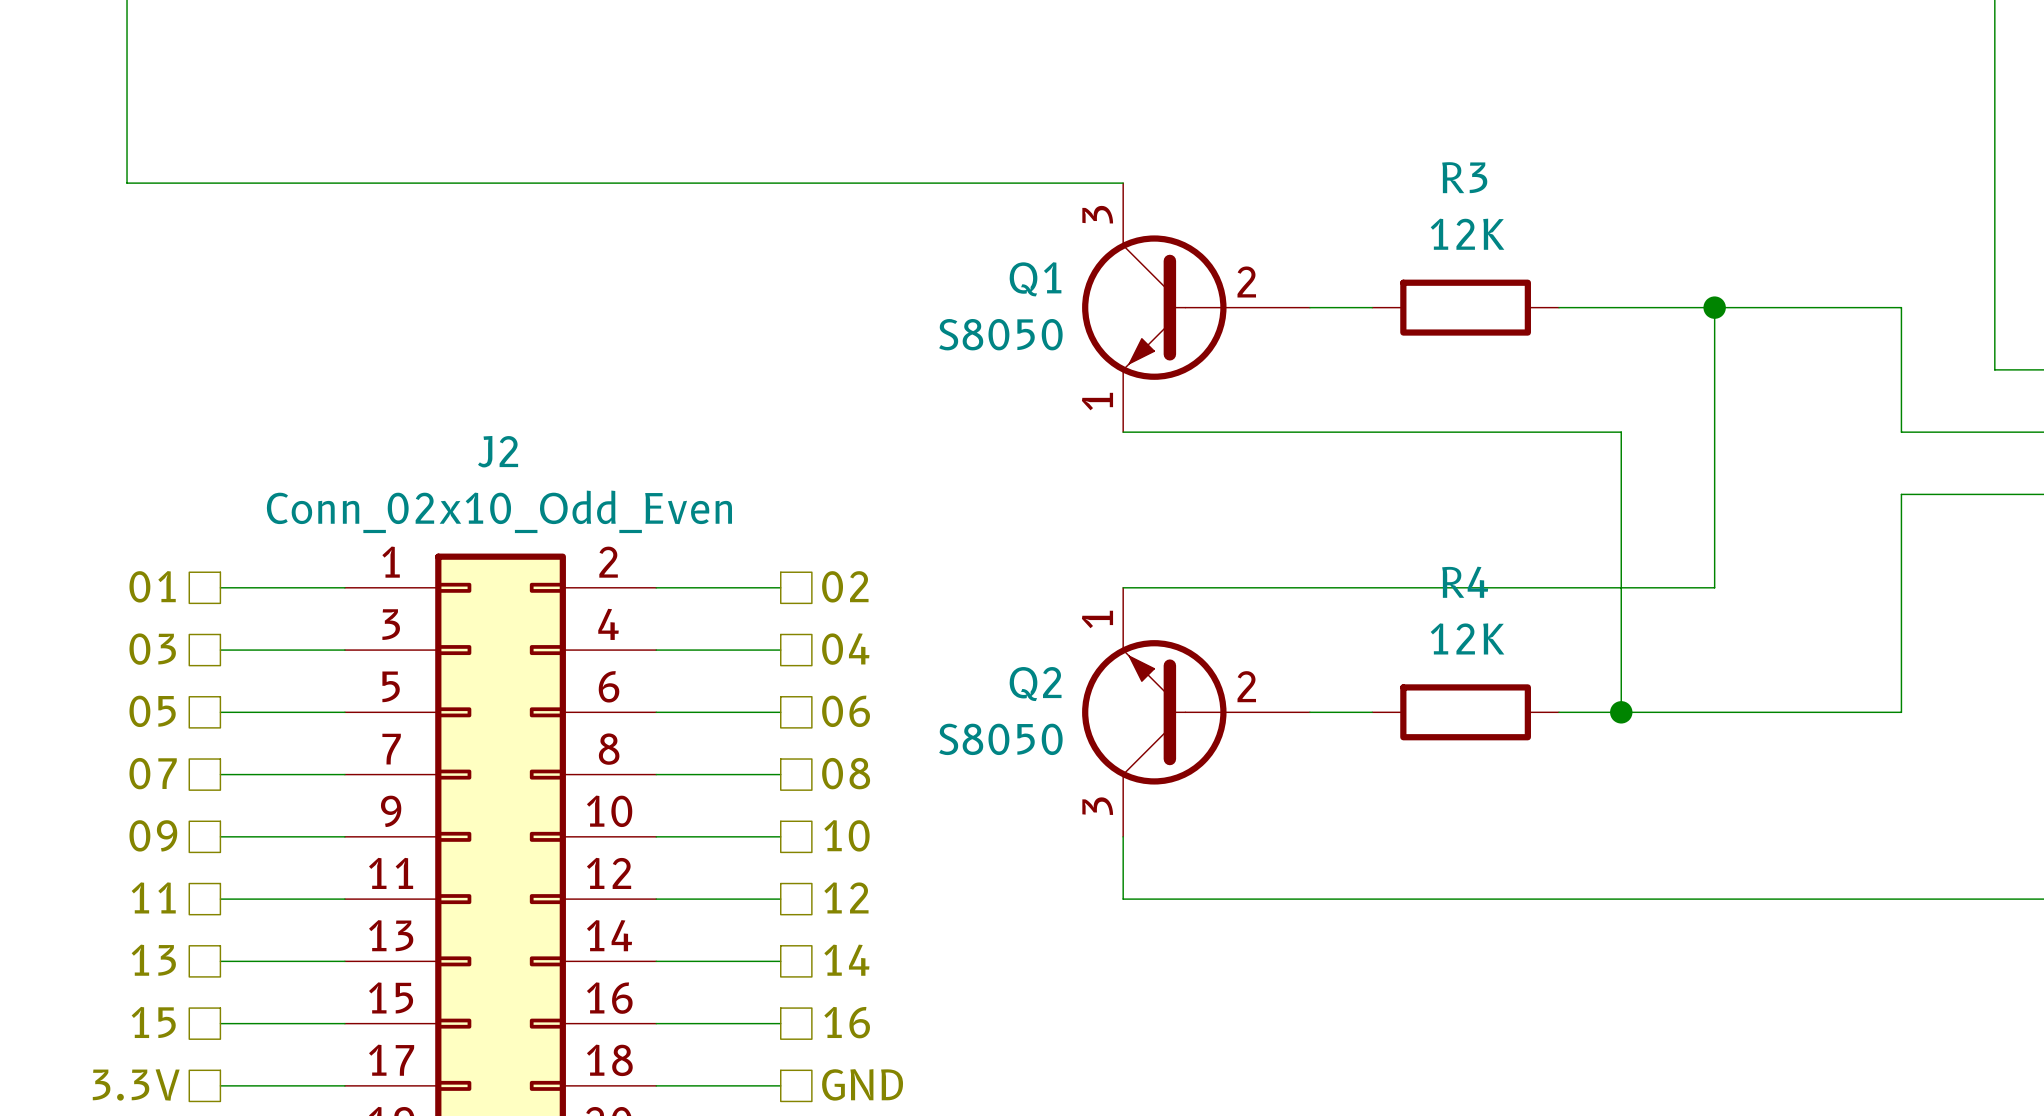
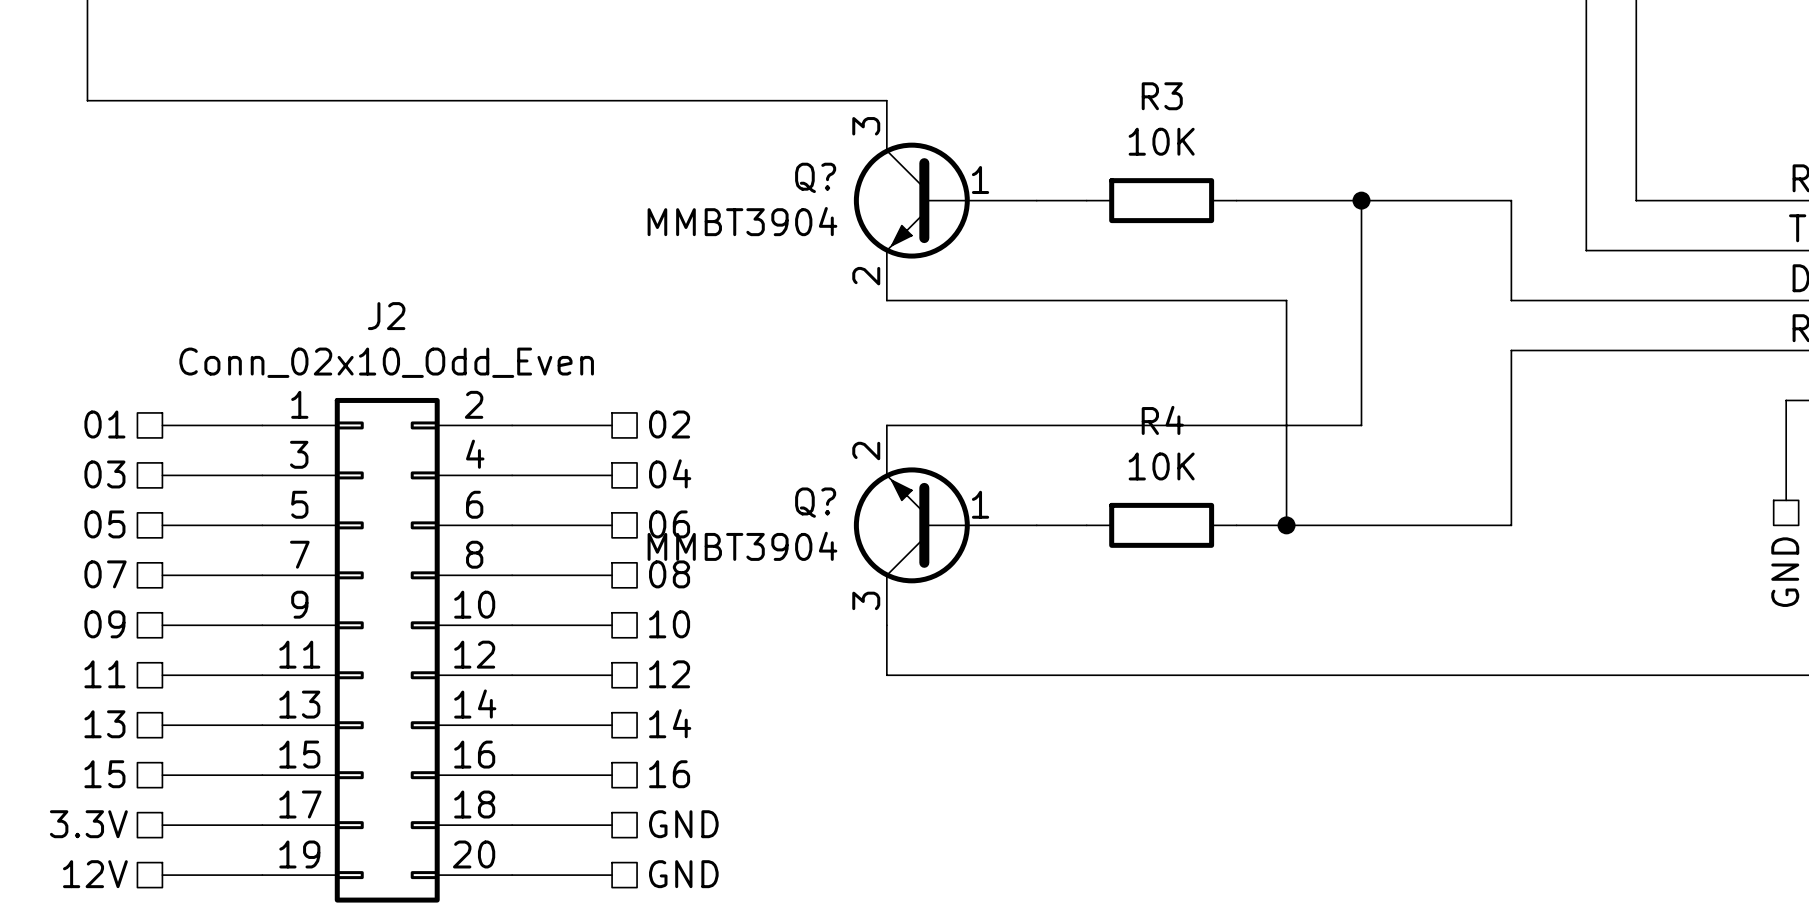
R3 value: 12K (1467, 234) -> 10K (1161, 141)
Q1: S8050 (1196, 307) -> none
Q?: none -> MMBT3904 (945, 200)
R4 value: 12K (1467, 638) -> 10K (1161, 466)
Q2: S8050 (1196, 712) -> none
Q?: none -> MMBT3904 (945, 525)

